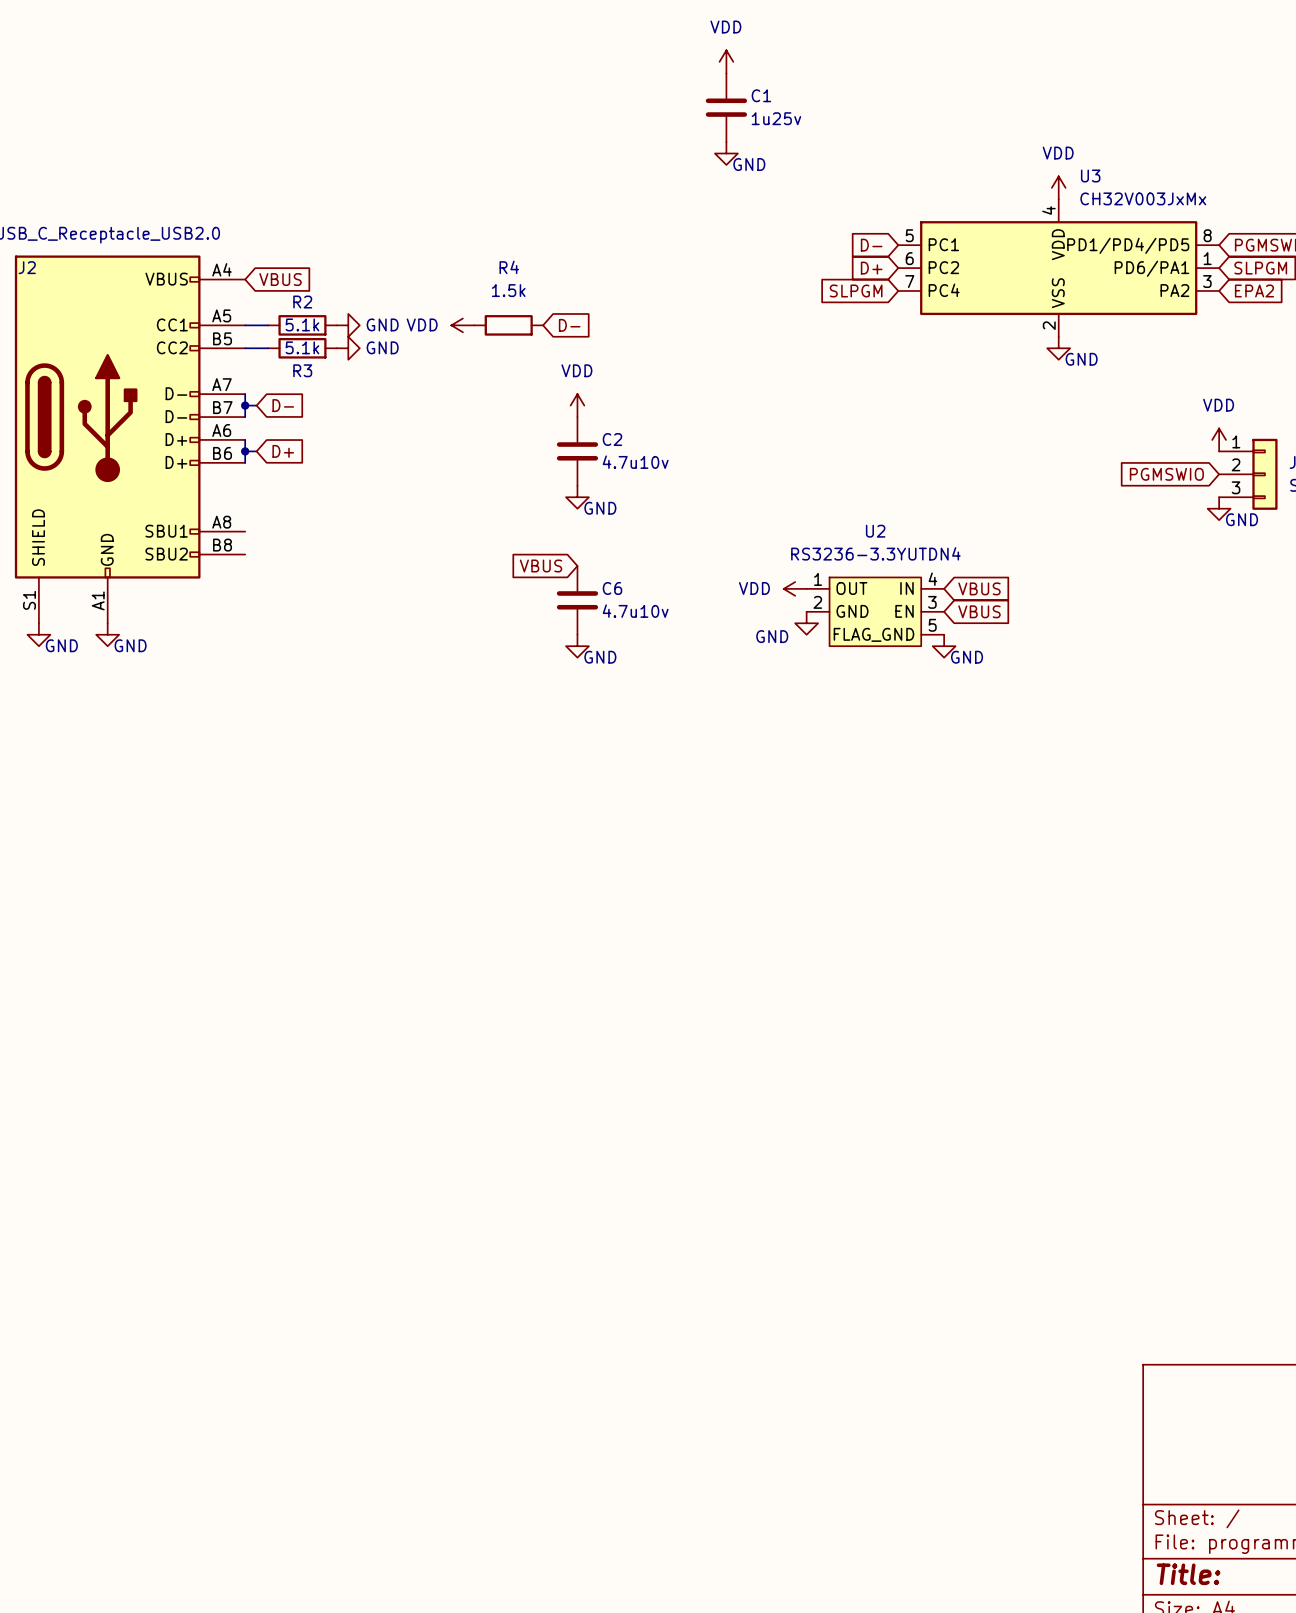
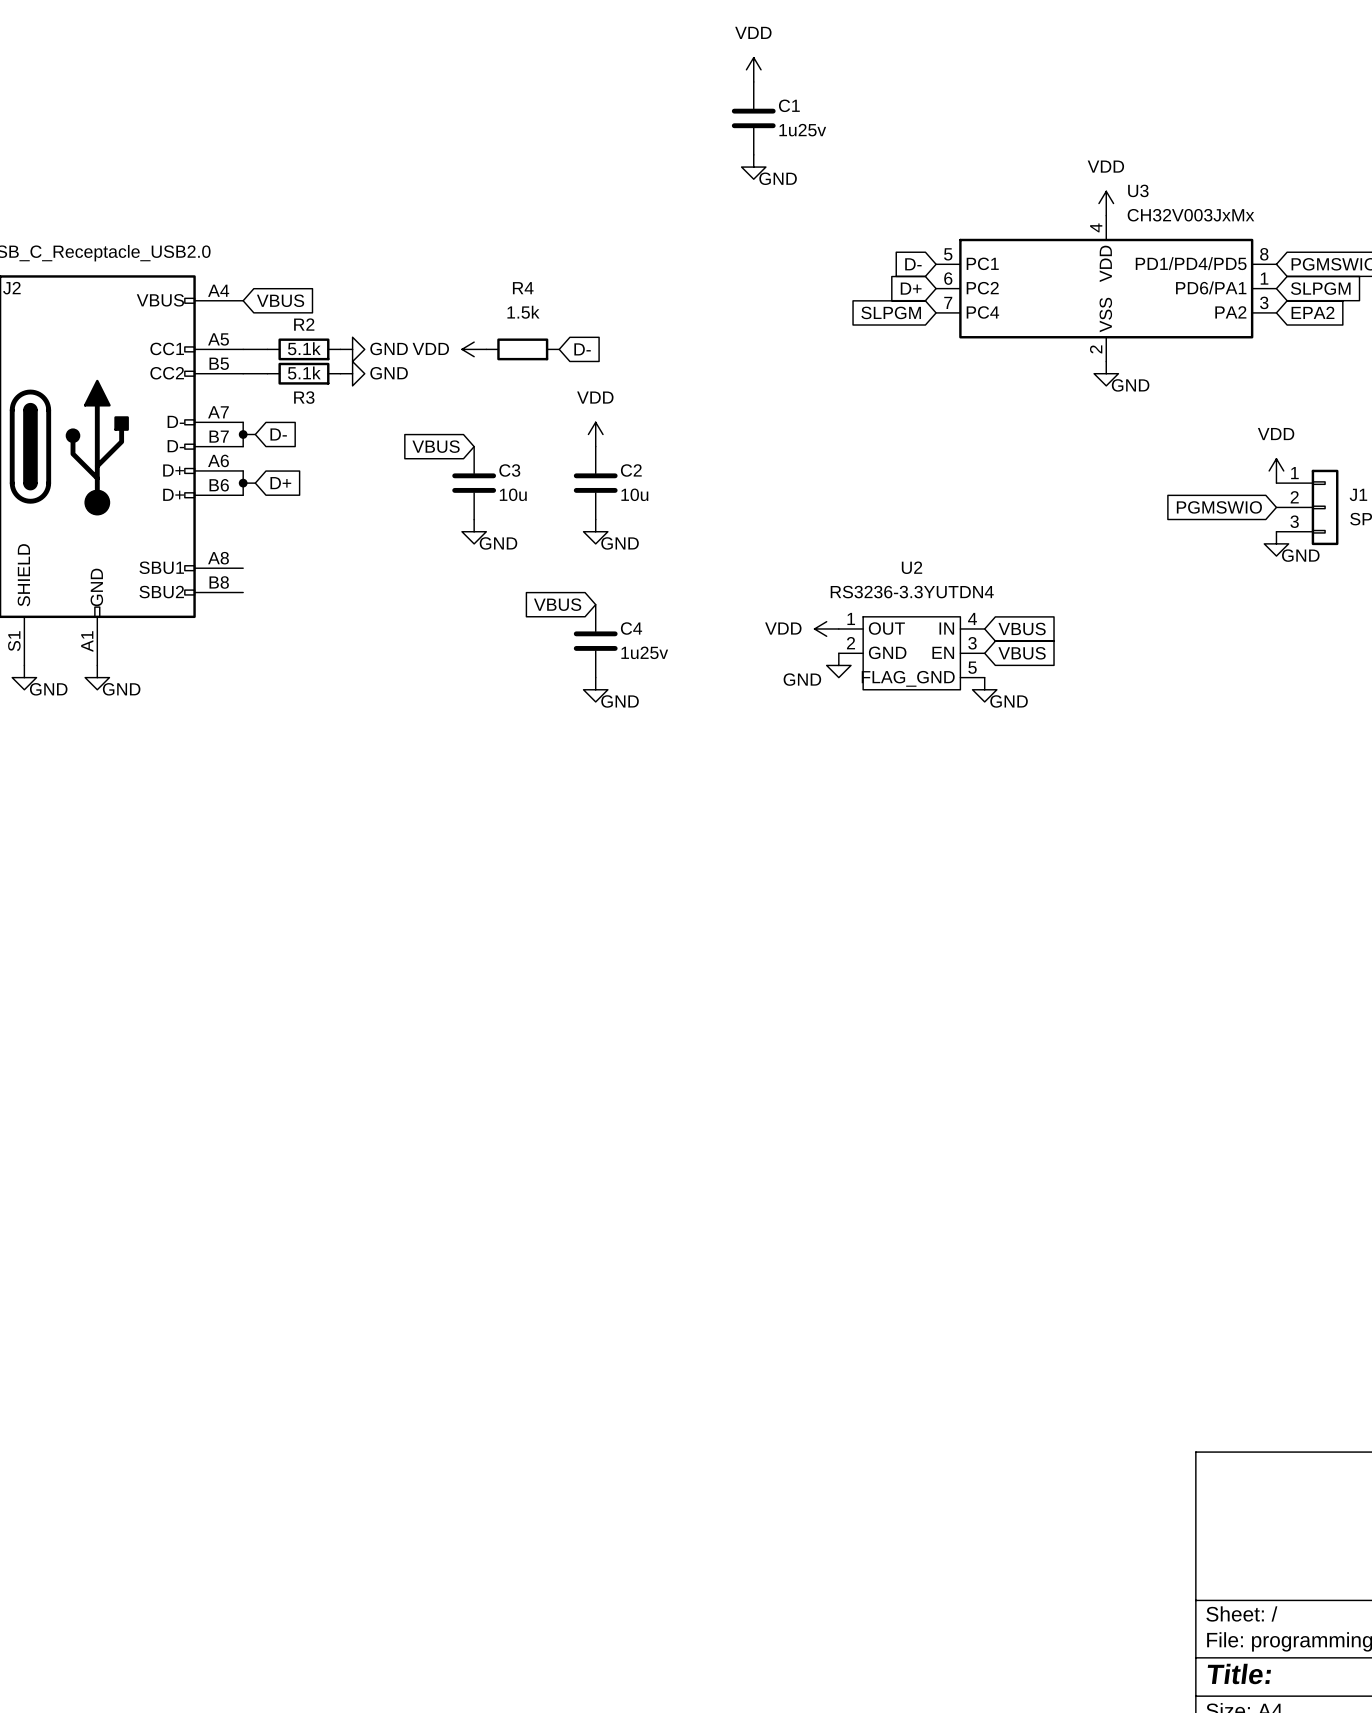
global label: none -> VBUS (436, 446)
C3: none -> 10u (474, 483)
C2 value: 4.7u10v (635, 462) -> 10u (634, 494)
power symbol: none -> GND (474, 531)
C6 name: C6 (612, 588) -> C4 (631, 628)
C6 value: 4.7u10v (635, 611) -> 1u25v (644, 652)

